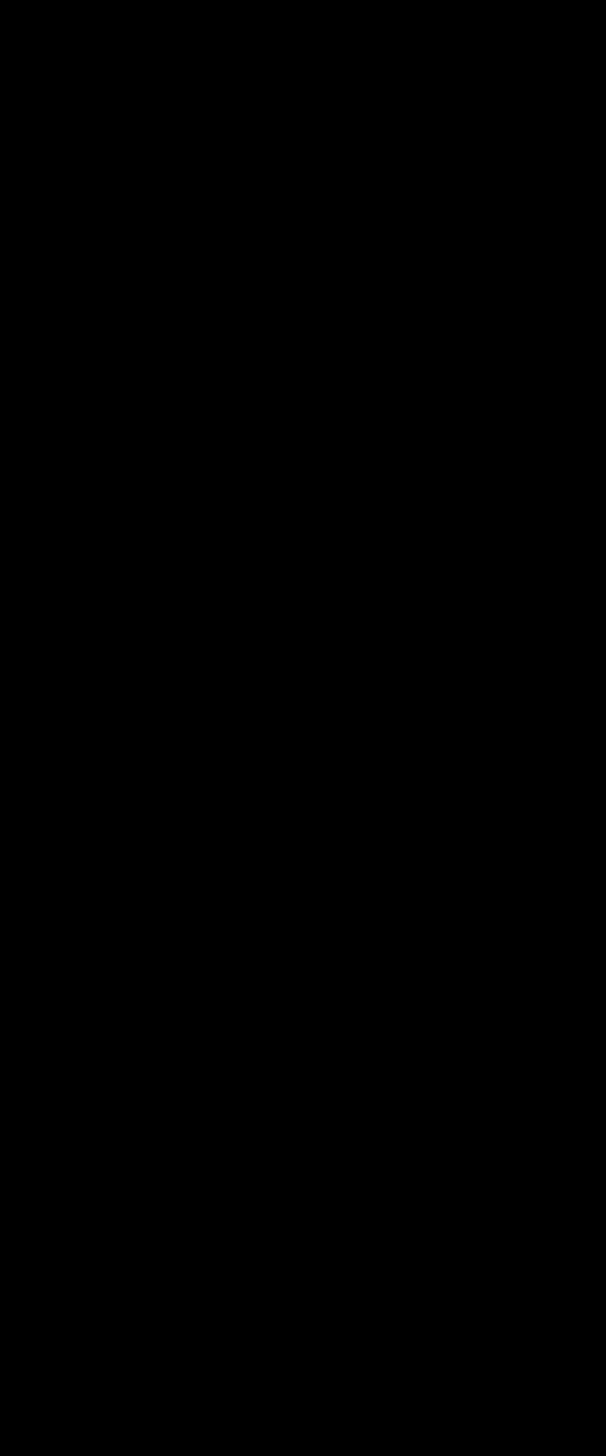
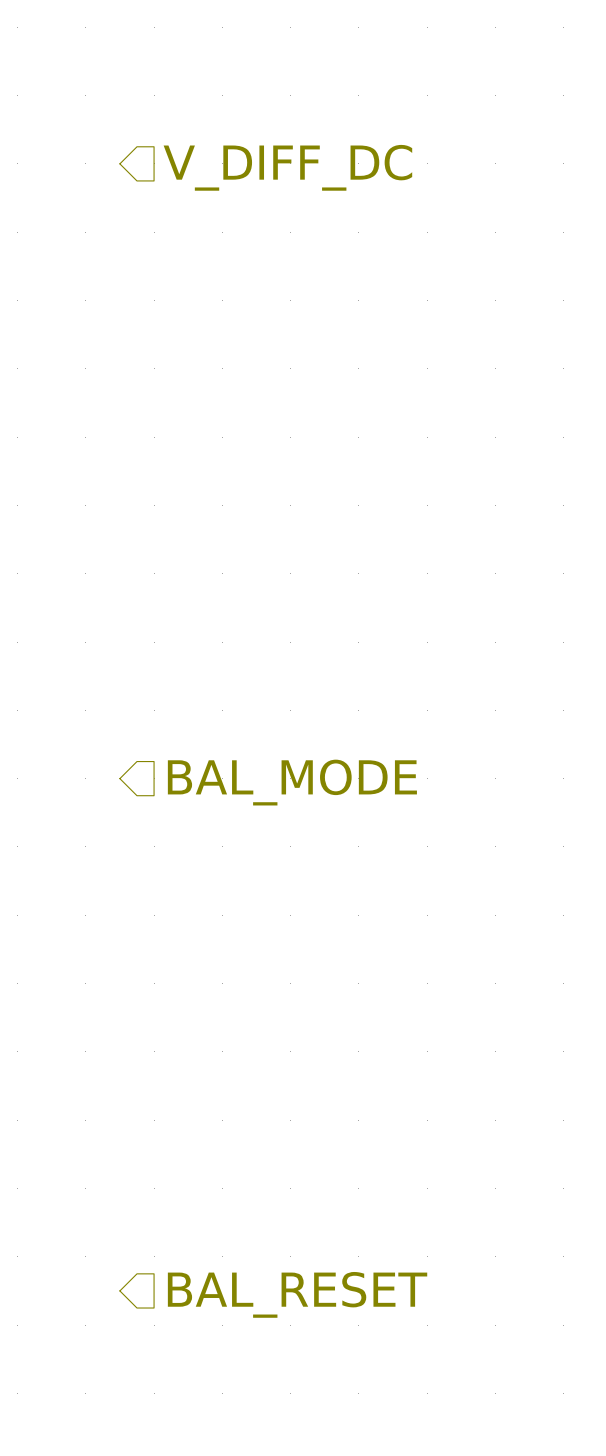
hierarchical label: none -> V_DIFF_DC (287, 167)
hierarchical label: none -> BAL_MODE (292, 782)
hierarchical label: none -> BAL_RESET (297, 1294)

